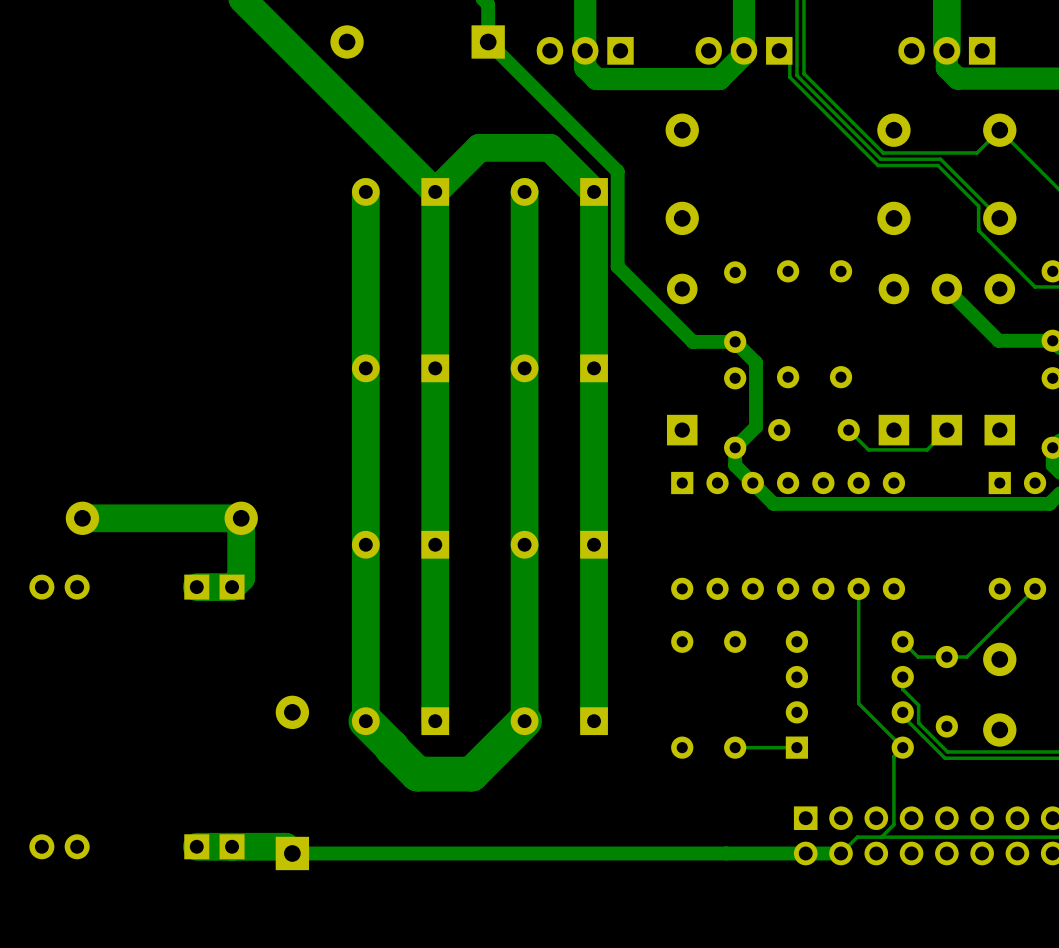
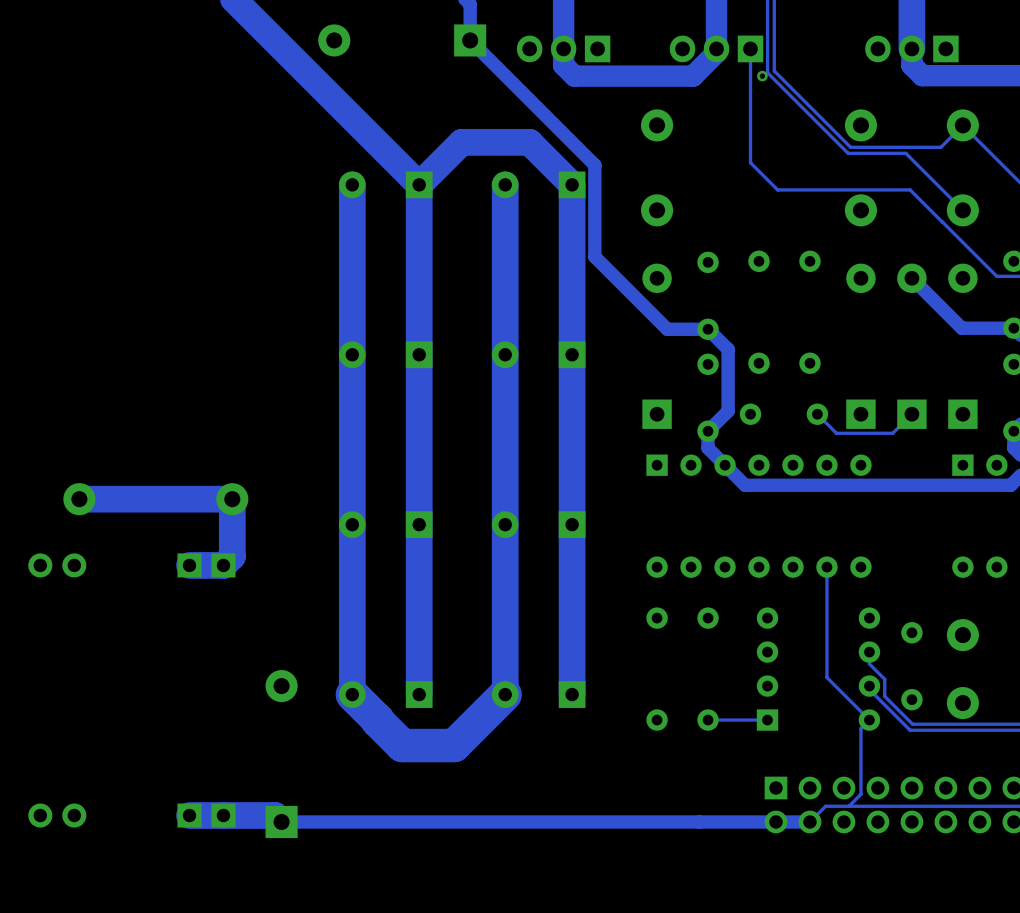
track: (779, 50) (789, 61) (789, 77) (878, 165) (938, 165) (978, 206) (978, 230) -> (750, 48) (750, 162) (777, 189) (910, 189) (942, 222)
via: none -> (762, 76)
track: (1035, 588) (966, 657) (917, 657) (902, 641) -> none

